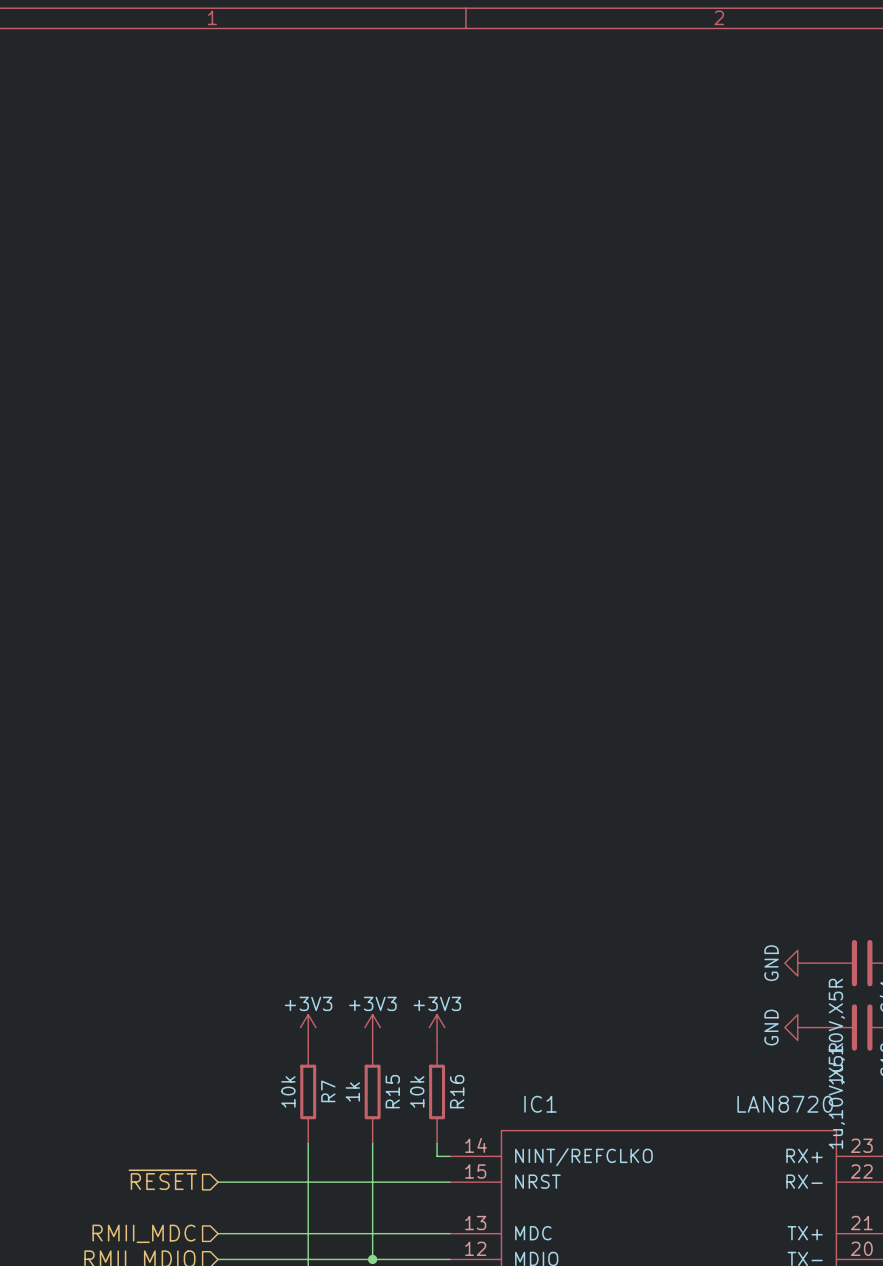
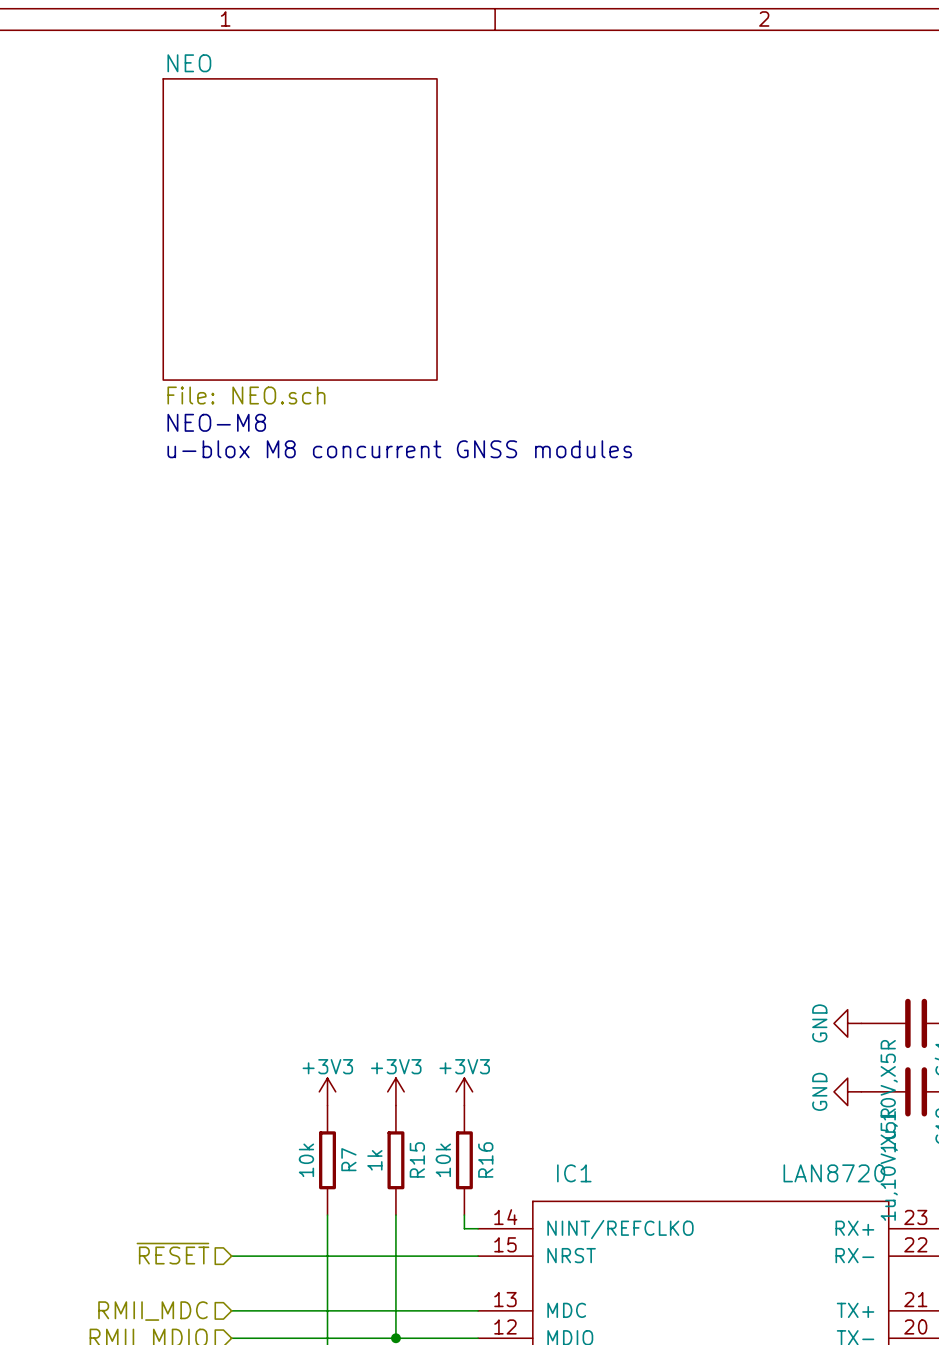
sheet NEO: none -> File: NEO.sch (300, 229)
text: none -> NEO-M8 (216, 422)
text: none -> u-blox M8 concurrent GNSS modules (399, 449)

